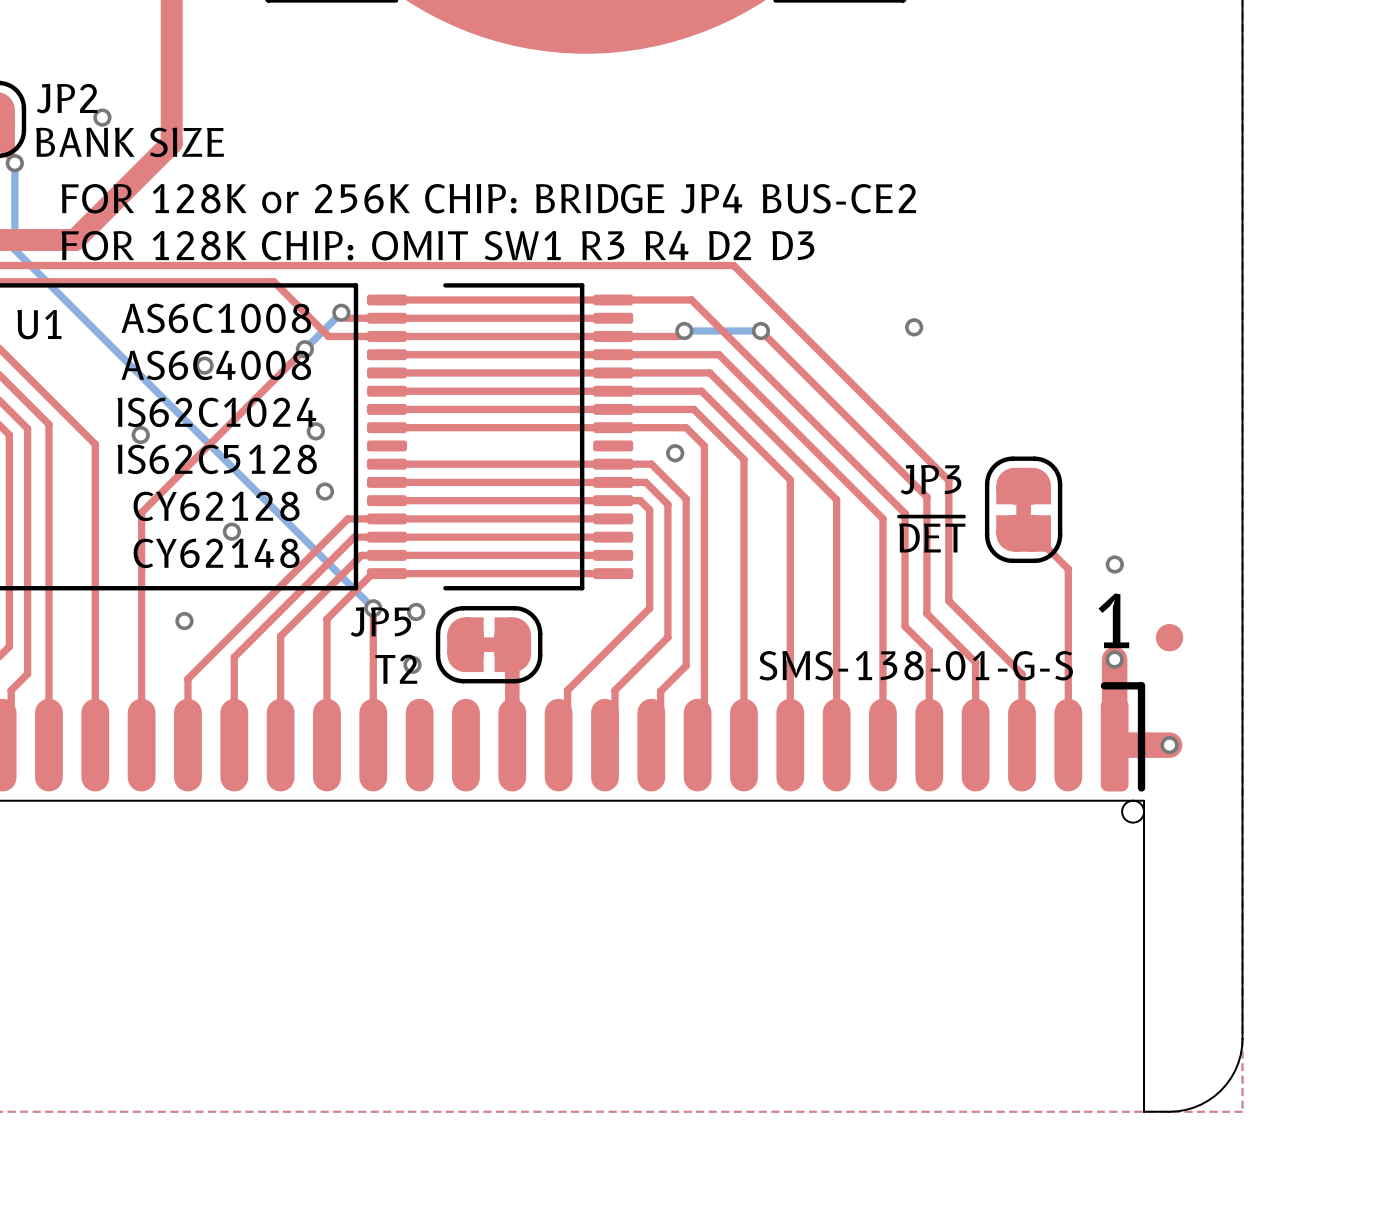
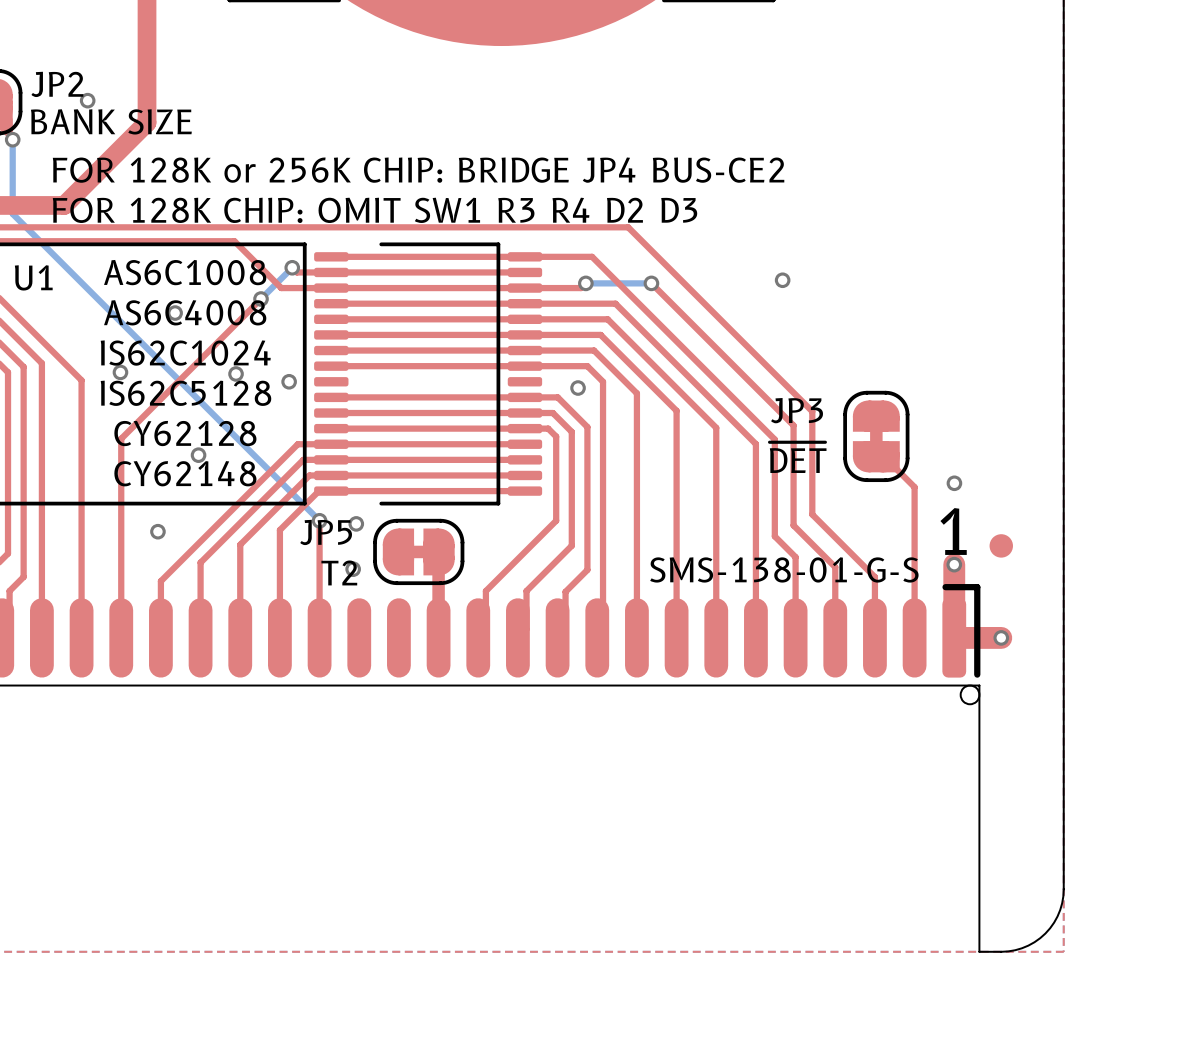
via: (315, 431) -> none
via: none -> (236, 373)
via: none -> (289, 381)
via: (324, 491) -> none

